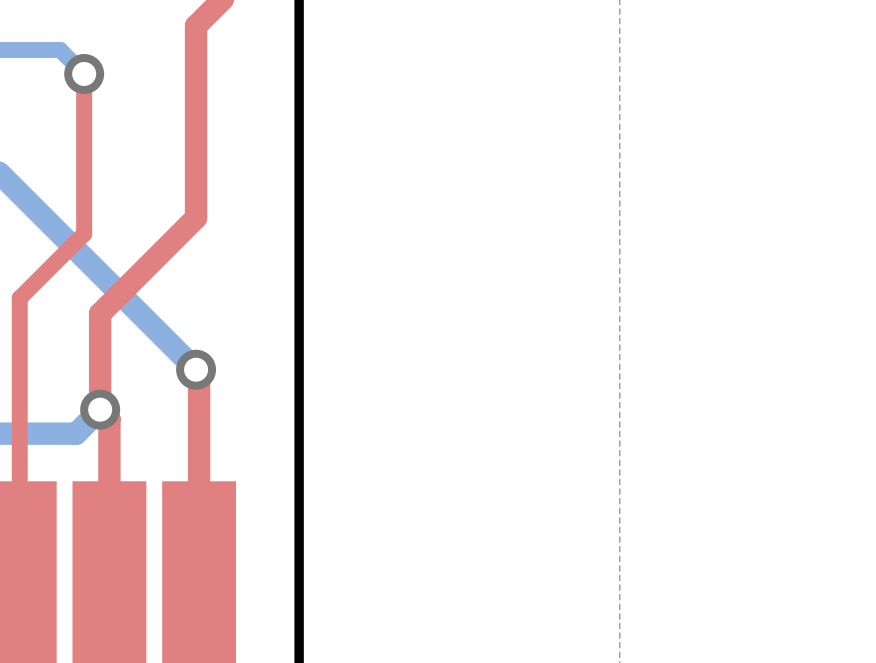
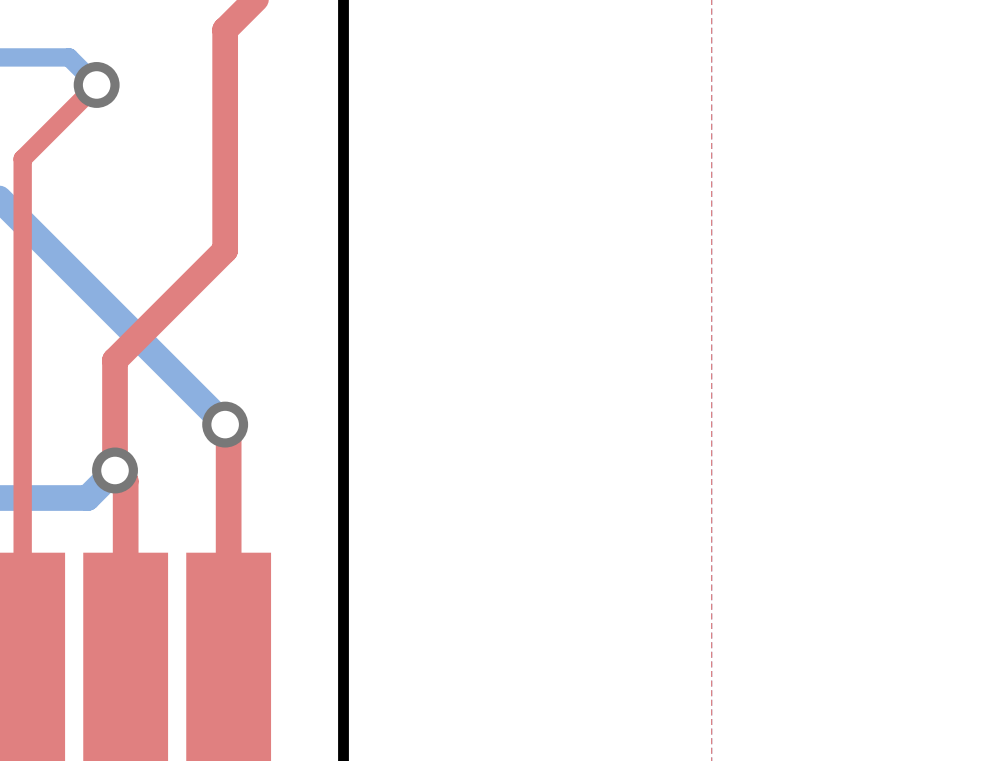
top track: (84, 73) (84, 233) (19, 298) -> (96, 84) (22, 158) (22, 342)

